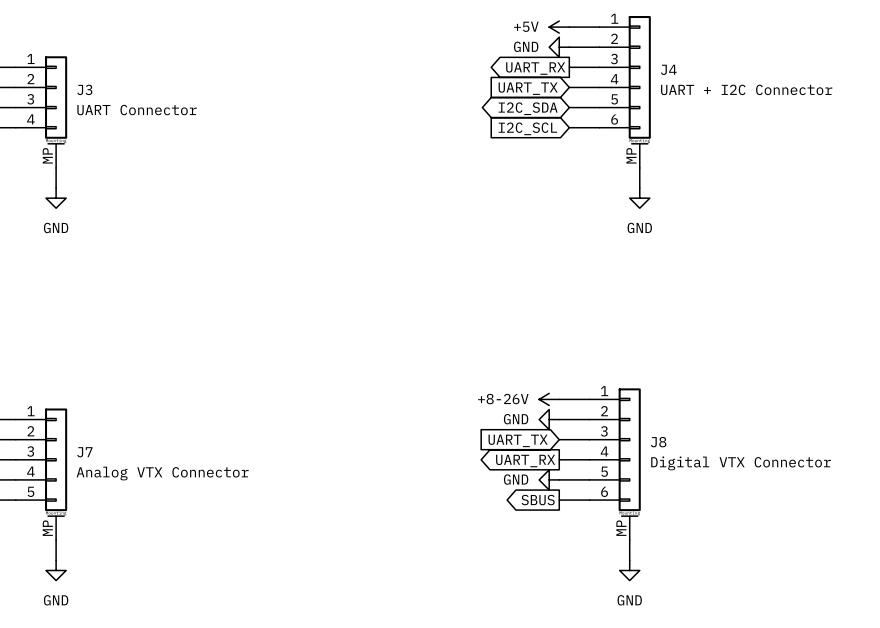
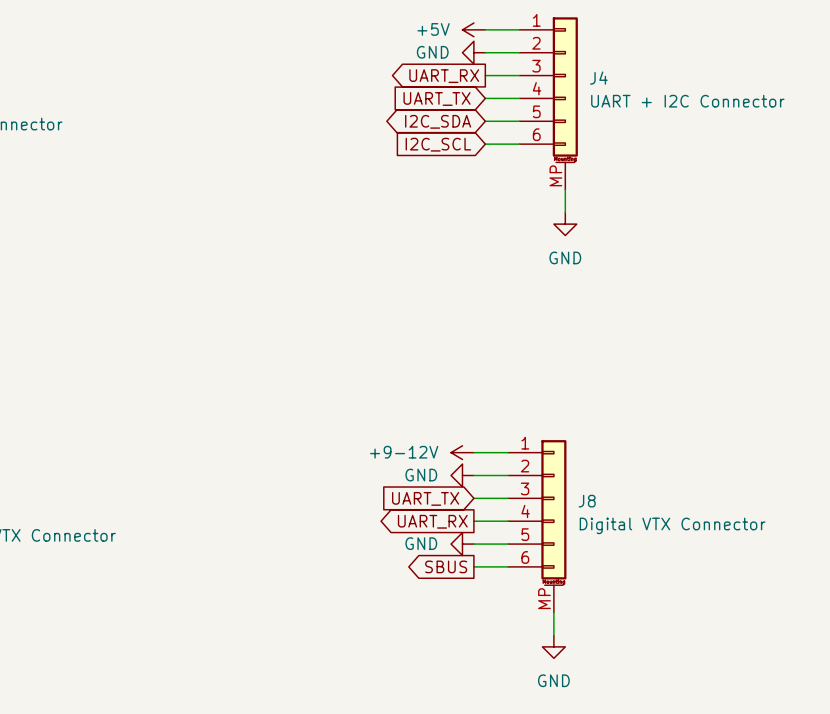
power symbol: +8-26V (549, 399) -> +9-12V (462, 452)

